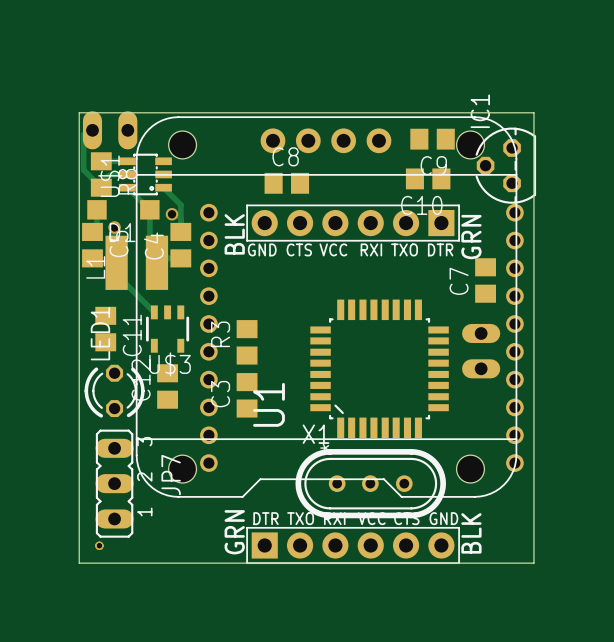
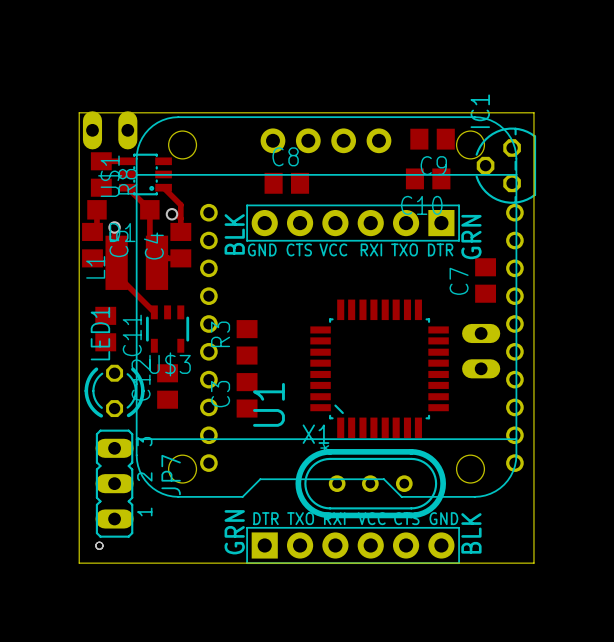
track: (92, 130) (88, 130) (83, 134) (83, 170) (101, 187) (103, 181) (107, 176) (127, 174) -> none

